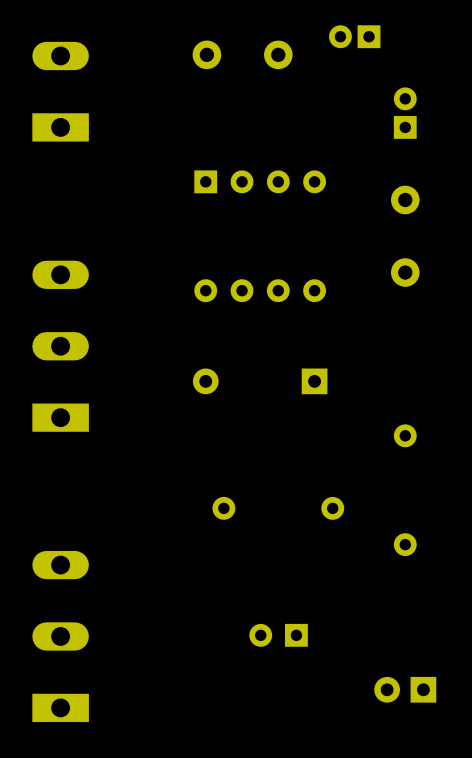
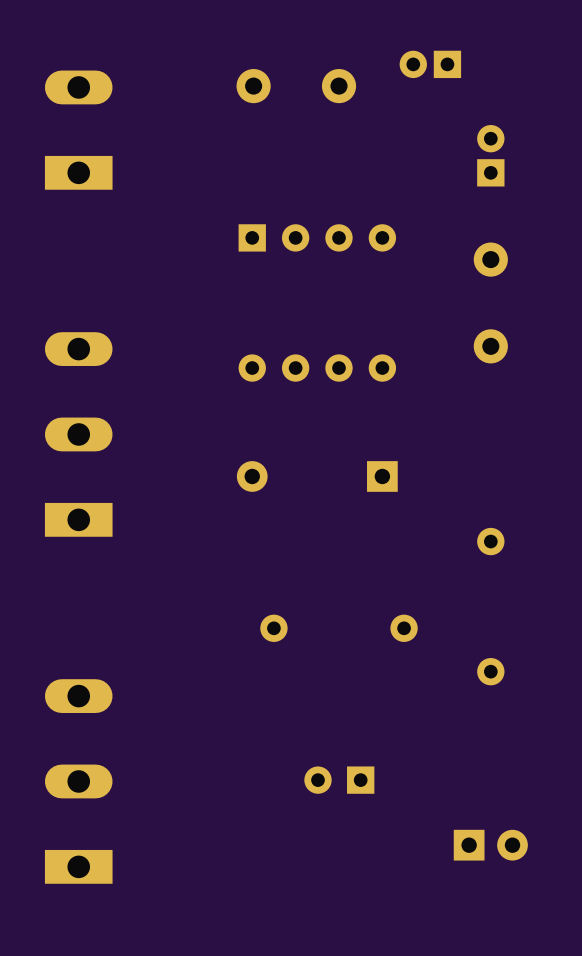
part rotation: 0° (405, 689) -> 180° (490, 845)

